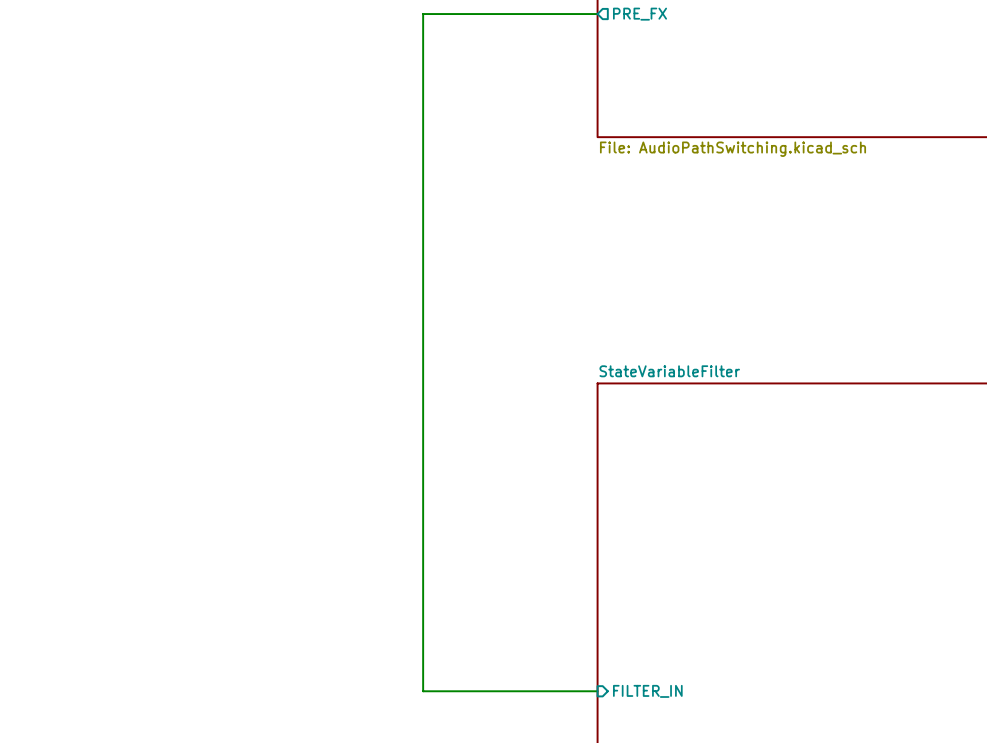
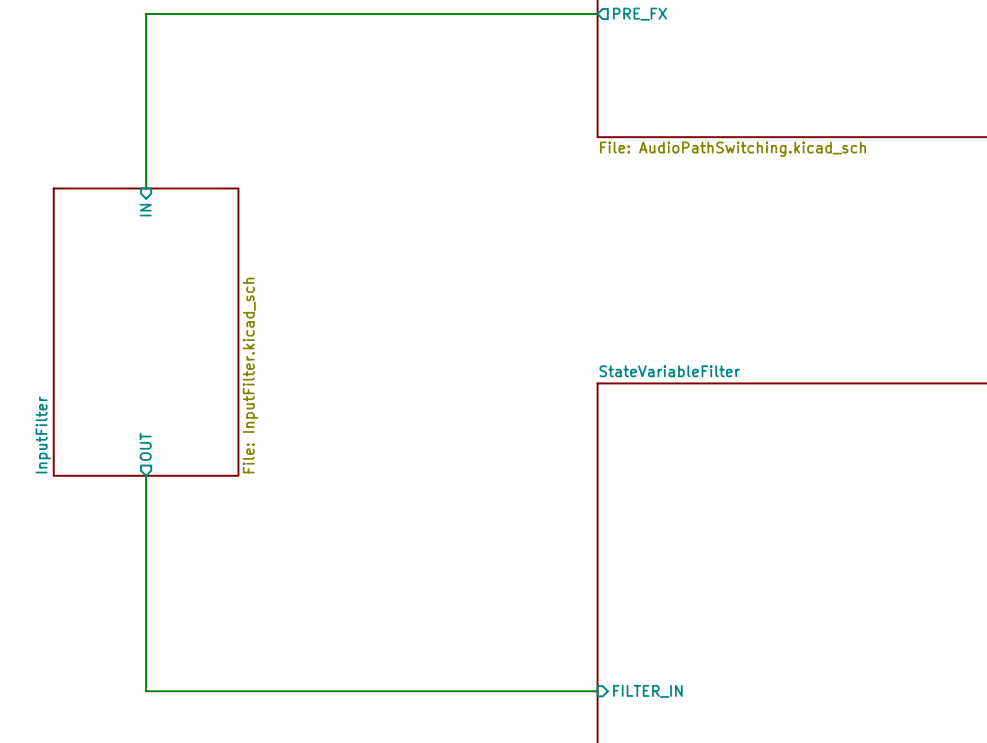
wire: (423, 14) (423, 691) -> (146, 475) (146, 691) (423, 691)
wire: none -> (423, 14) (146, 14) (146, 188)
sheet pin: none -> IN (145, 210)
sheet InputFilter: none -> File: InputFilter.kicad_sch (146, 332)
sheet pin: none -> OUT (145, 446)

